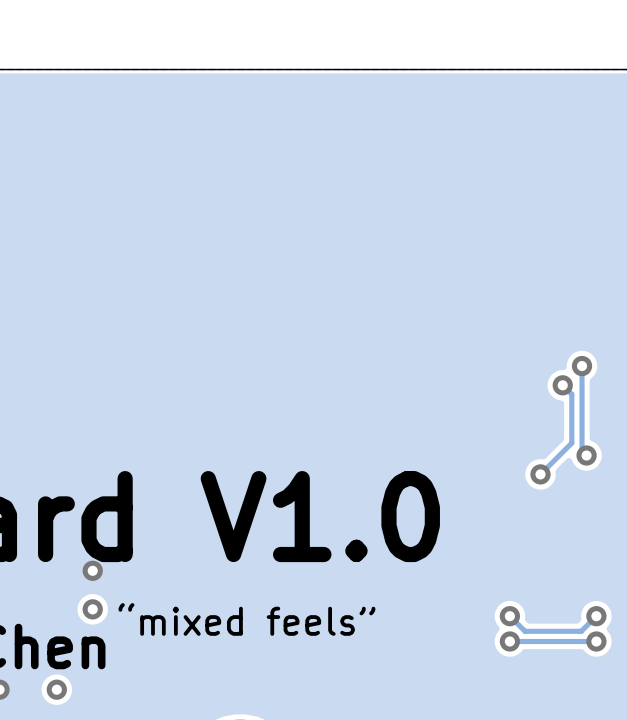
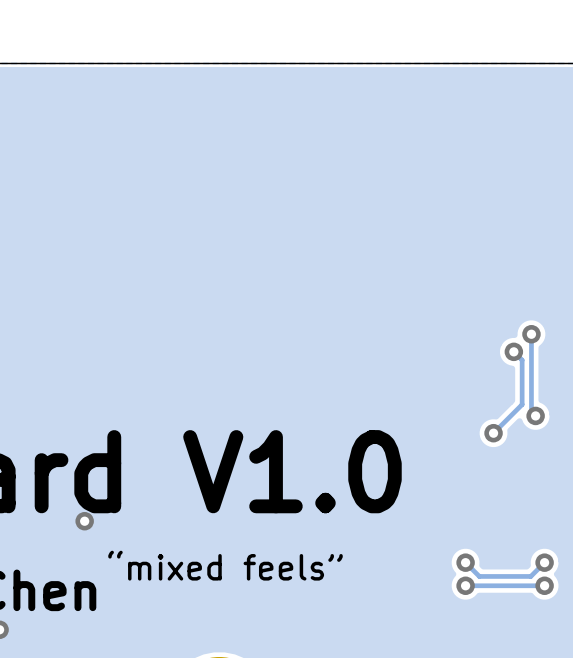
via: (92, 609) -> none
via: (56, 689) -> none

